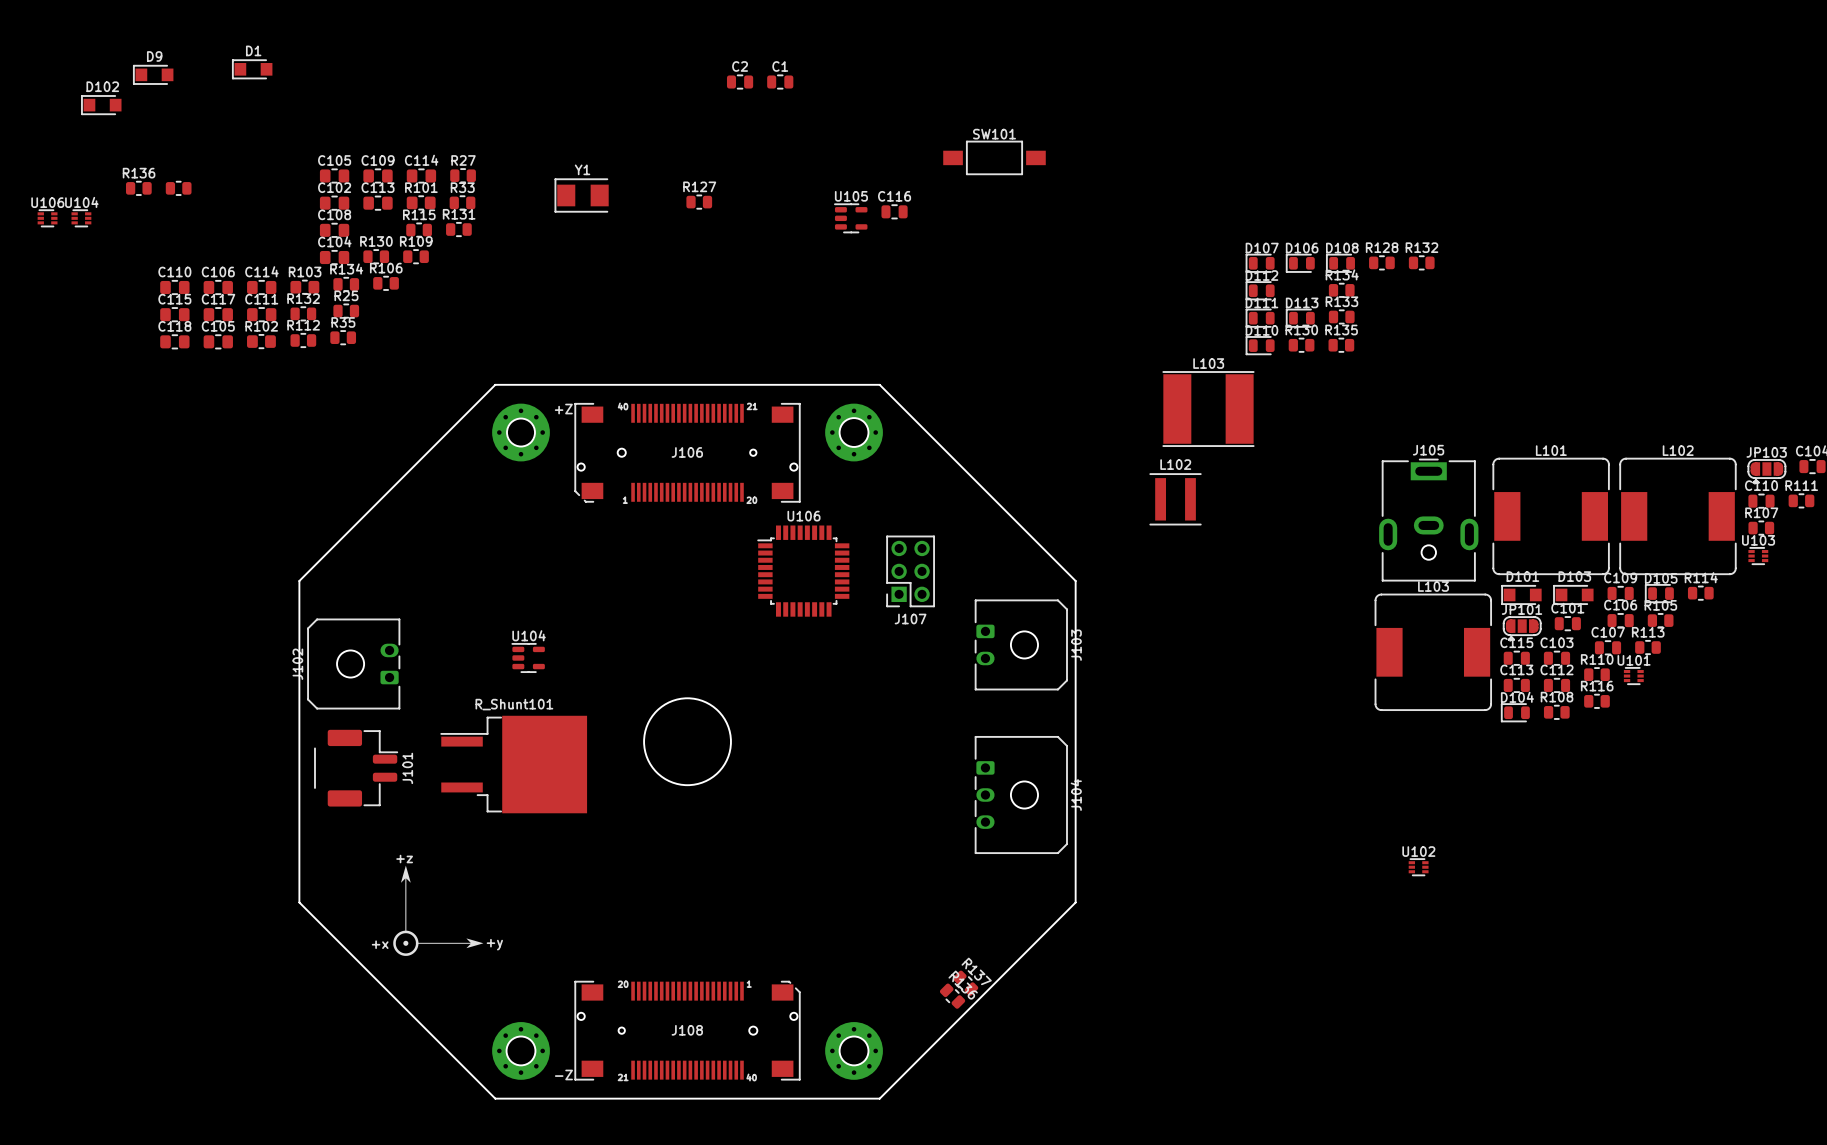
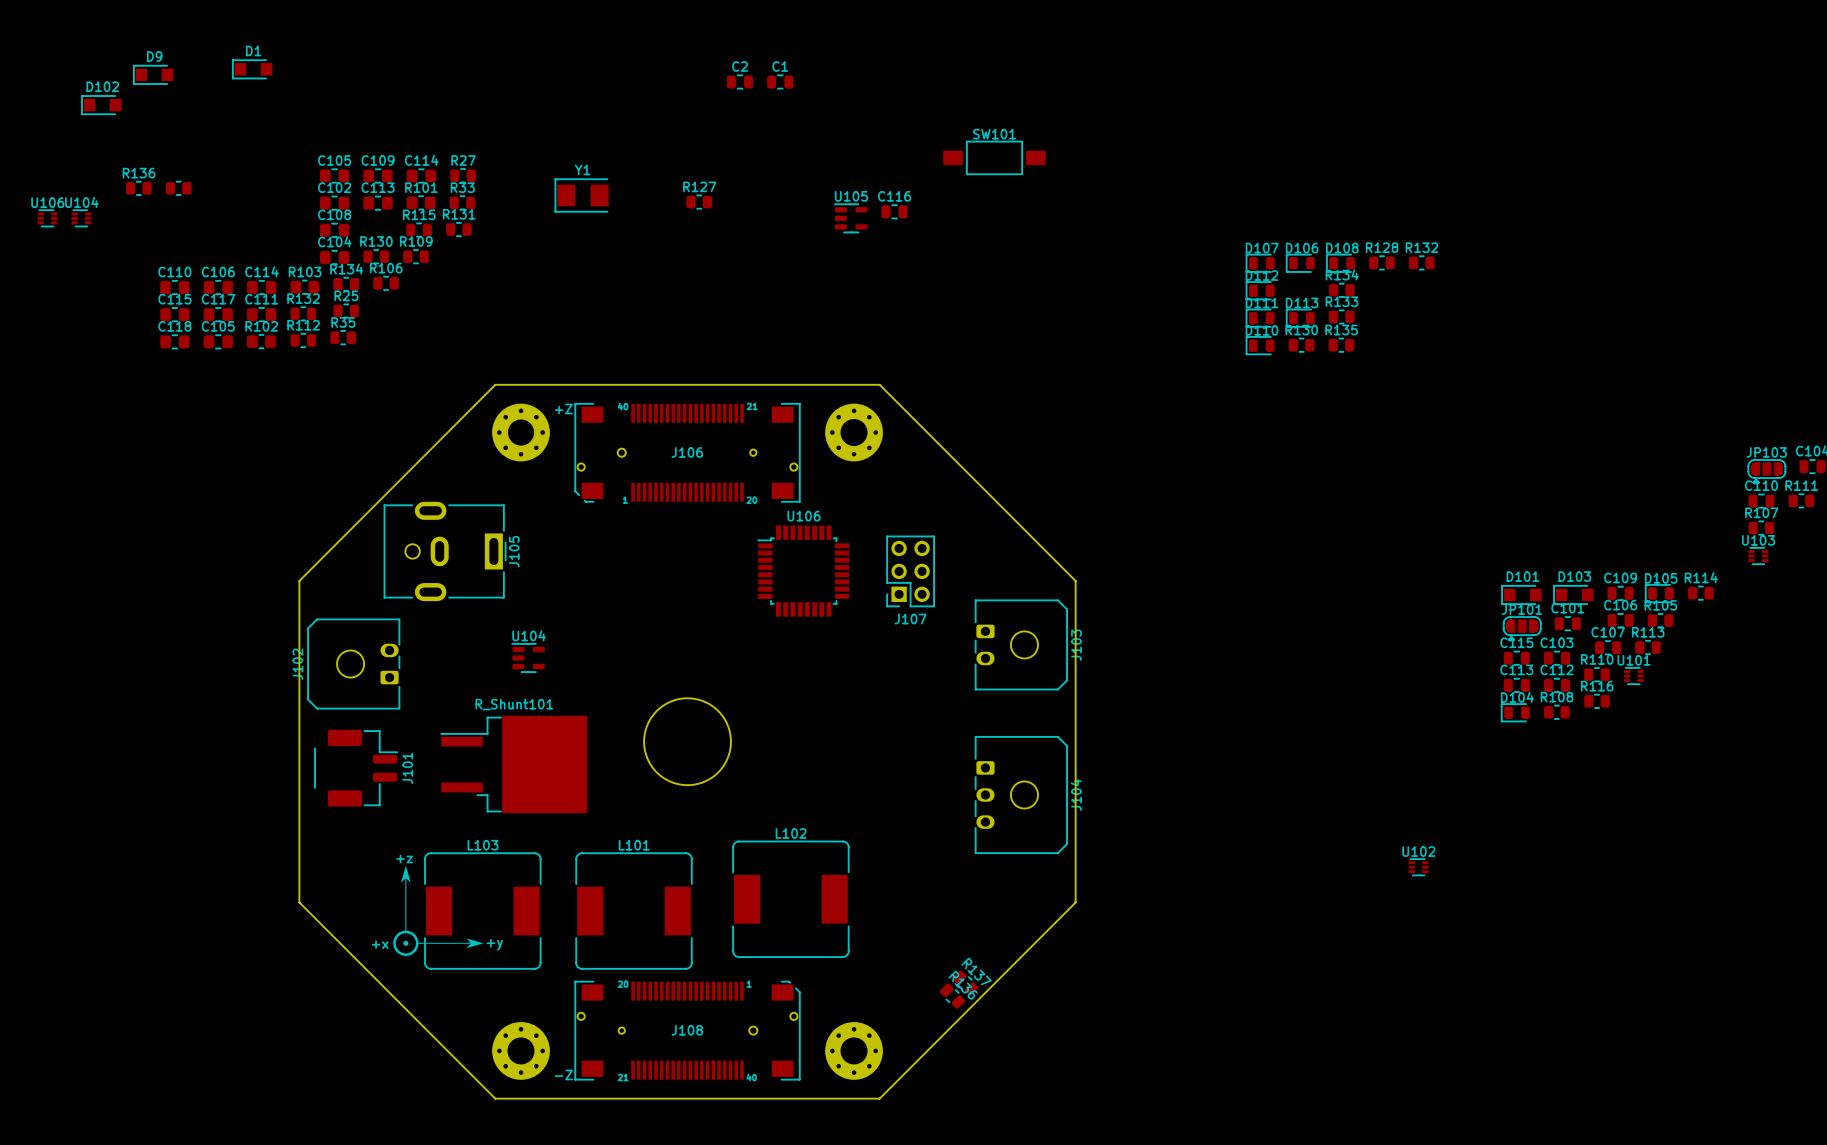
L103: (1208, 409) -> none
L102: (1175, 499) -> none
L101 position: (1551, 516) -> (634, 911)
L102: (1677, 516) -> none
J105 rotation: 0° (1428, 520) -> 90° clockwise (445, 551)
J105 position: (1428, 520) -> (445, 551)
L103: (1433, 652) -> none
L102: none -> (790, 899)
L103: none -> (482, 911)

